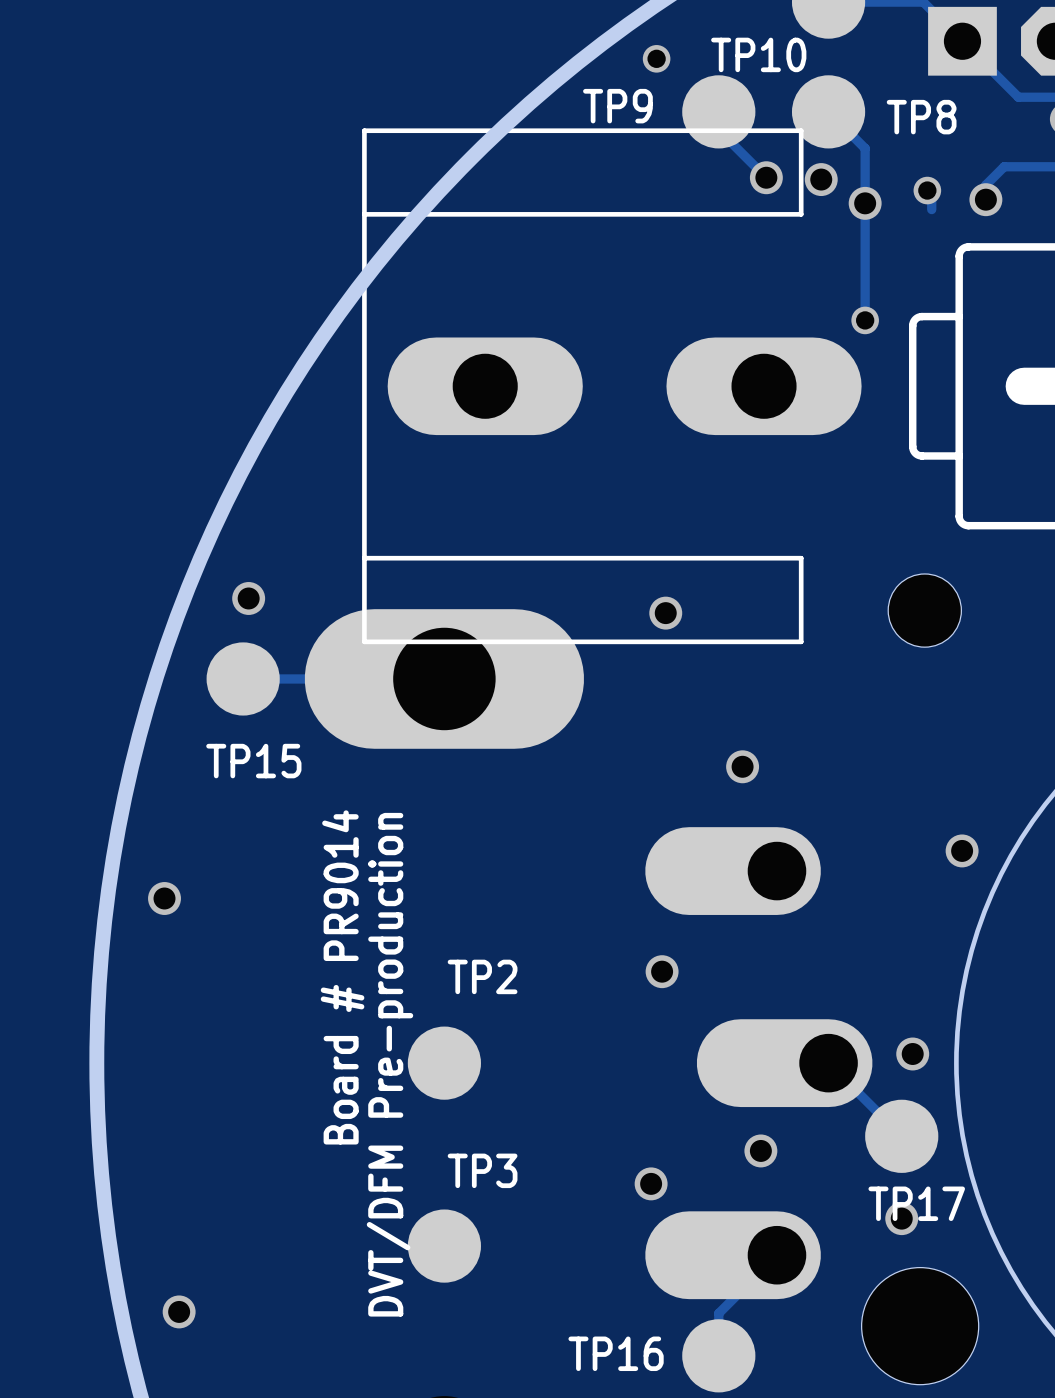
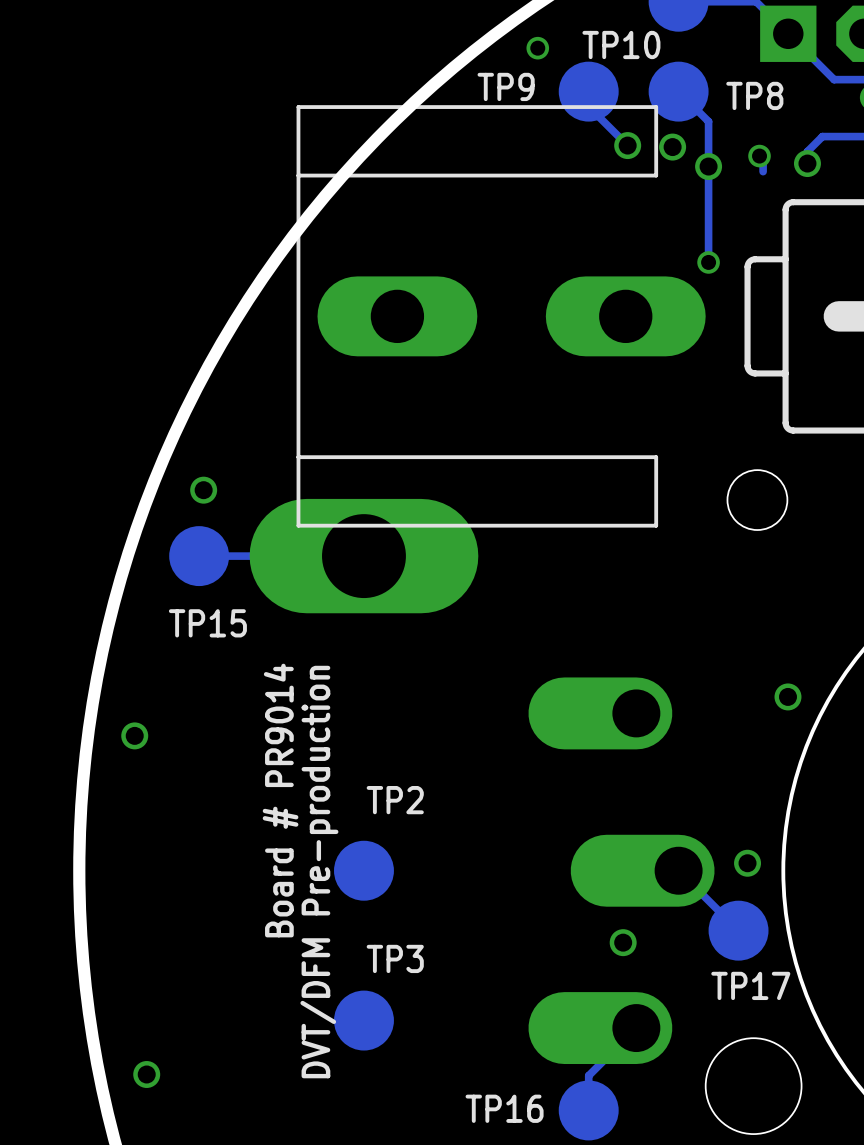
via: (665, 613) -> none
via: (742, 766) -> none
via: (662, 971) -> none
via: (651, 1183) -> none
via: (901, 1218) -> none

